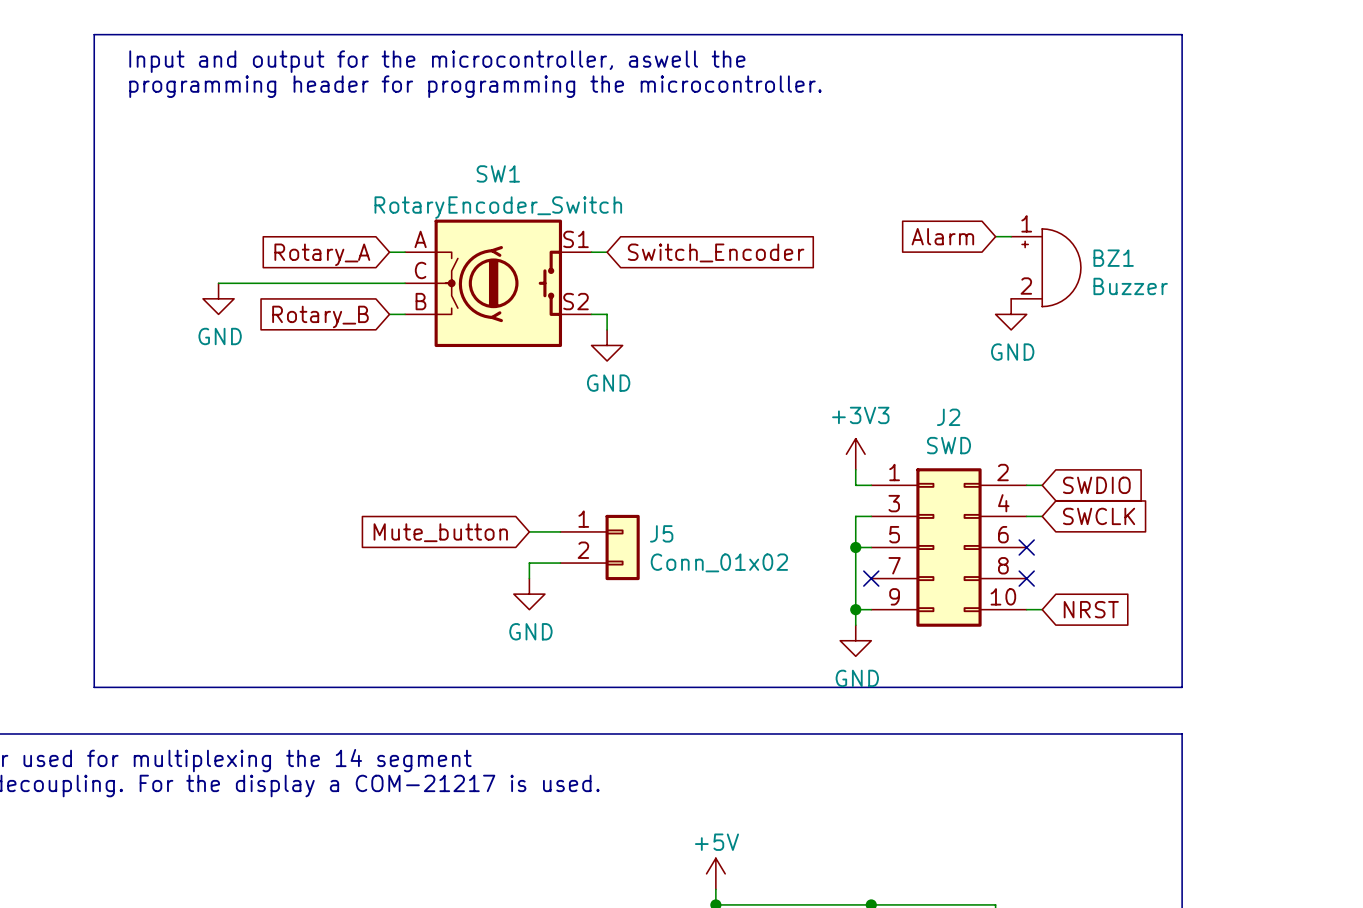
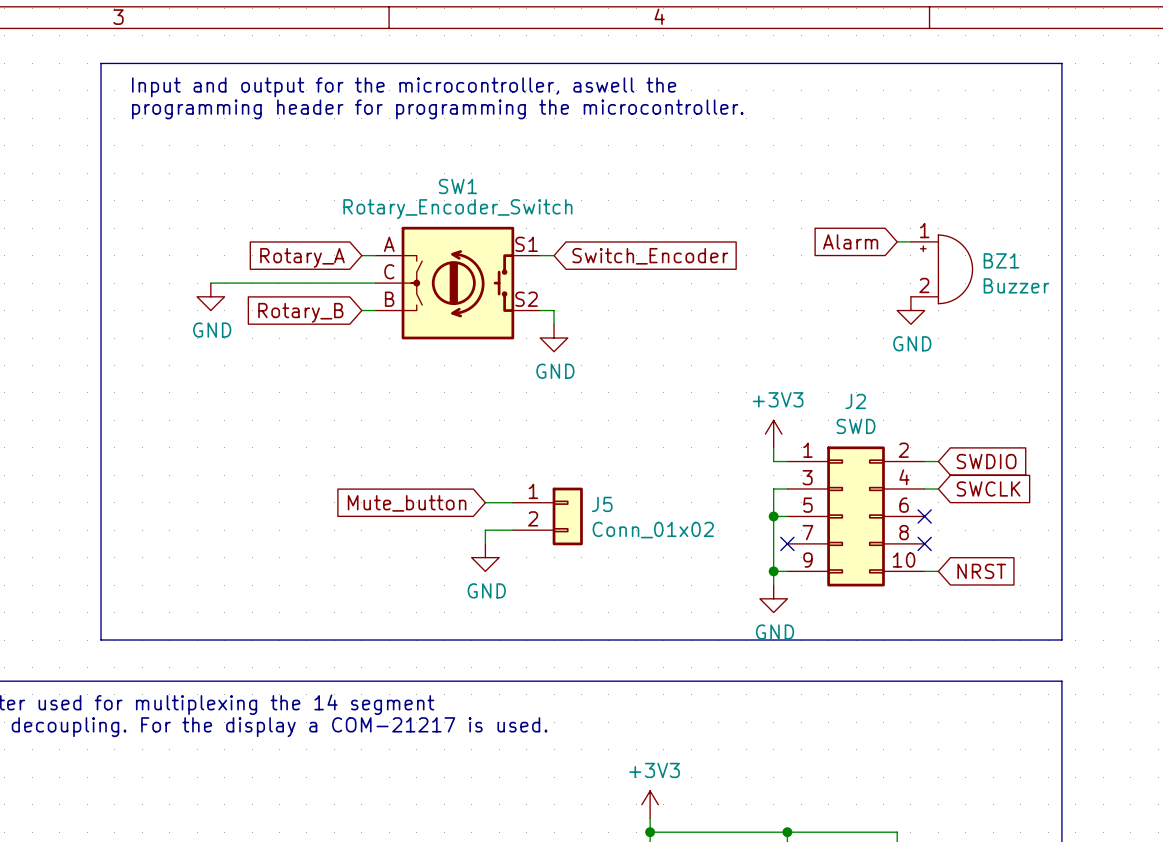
SW1 value: RotaryEncoder_Switch (498, 207) -> Rotary_Encoder_Switch (457, 209)
SW1 symbol: [405, 219, 592, 348] -> [375, 226, 541, 340]
power symbol: +5V (715, 873) -> +3V3 (650, 804)

